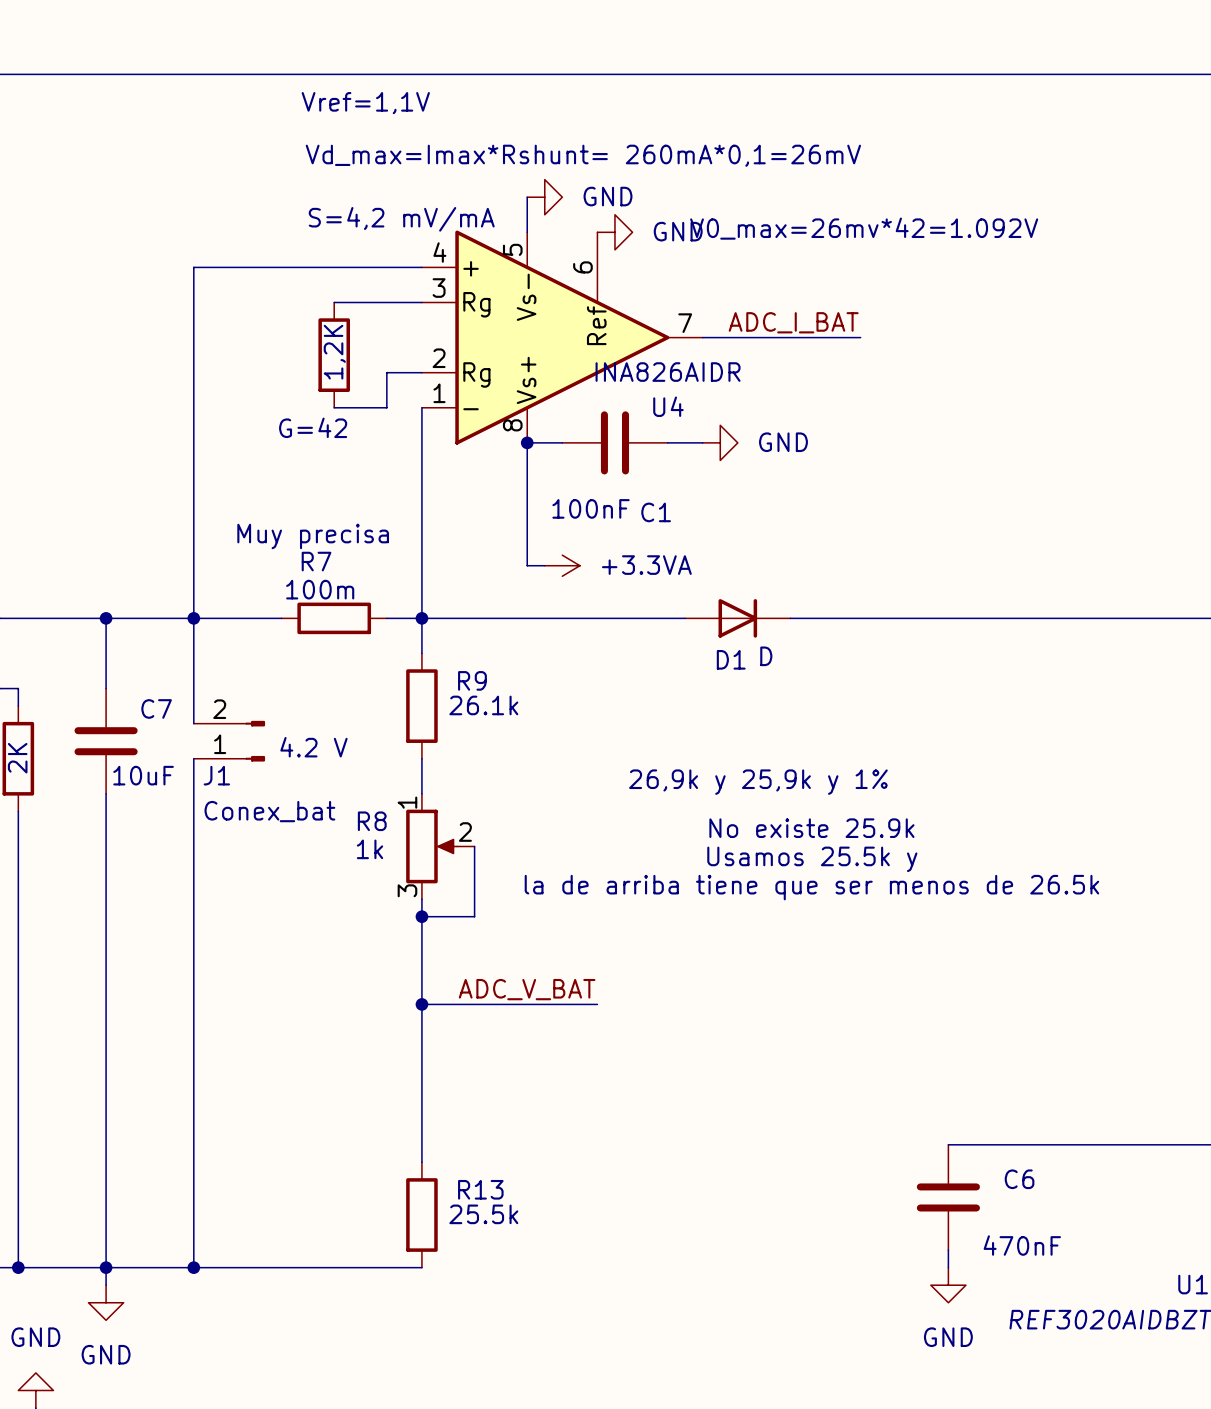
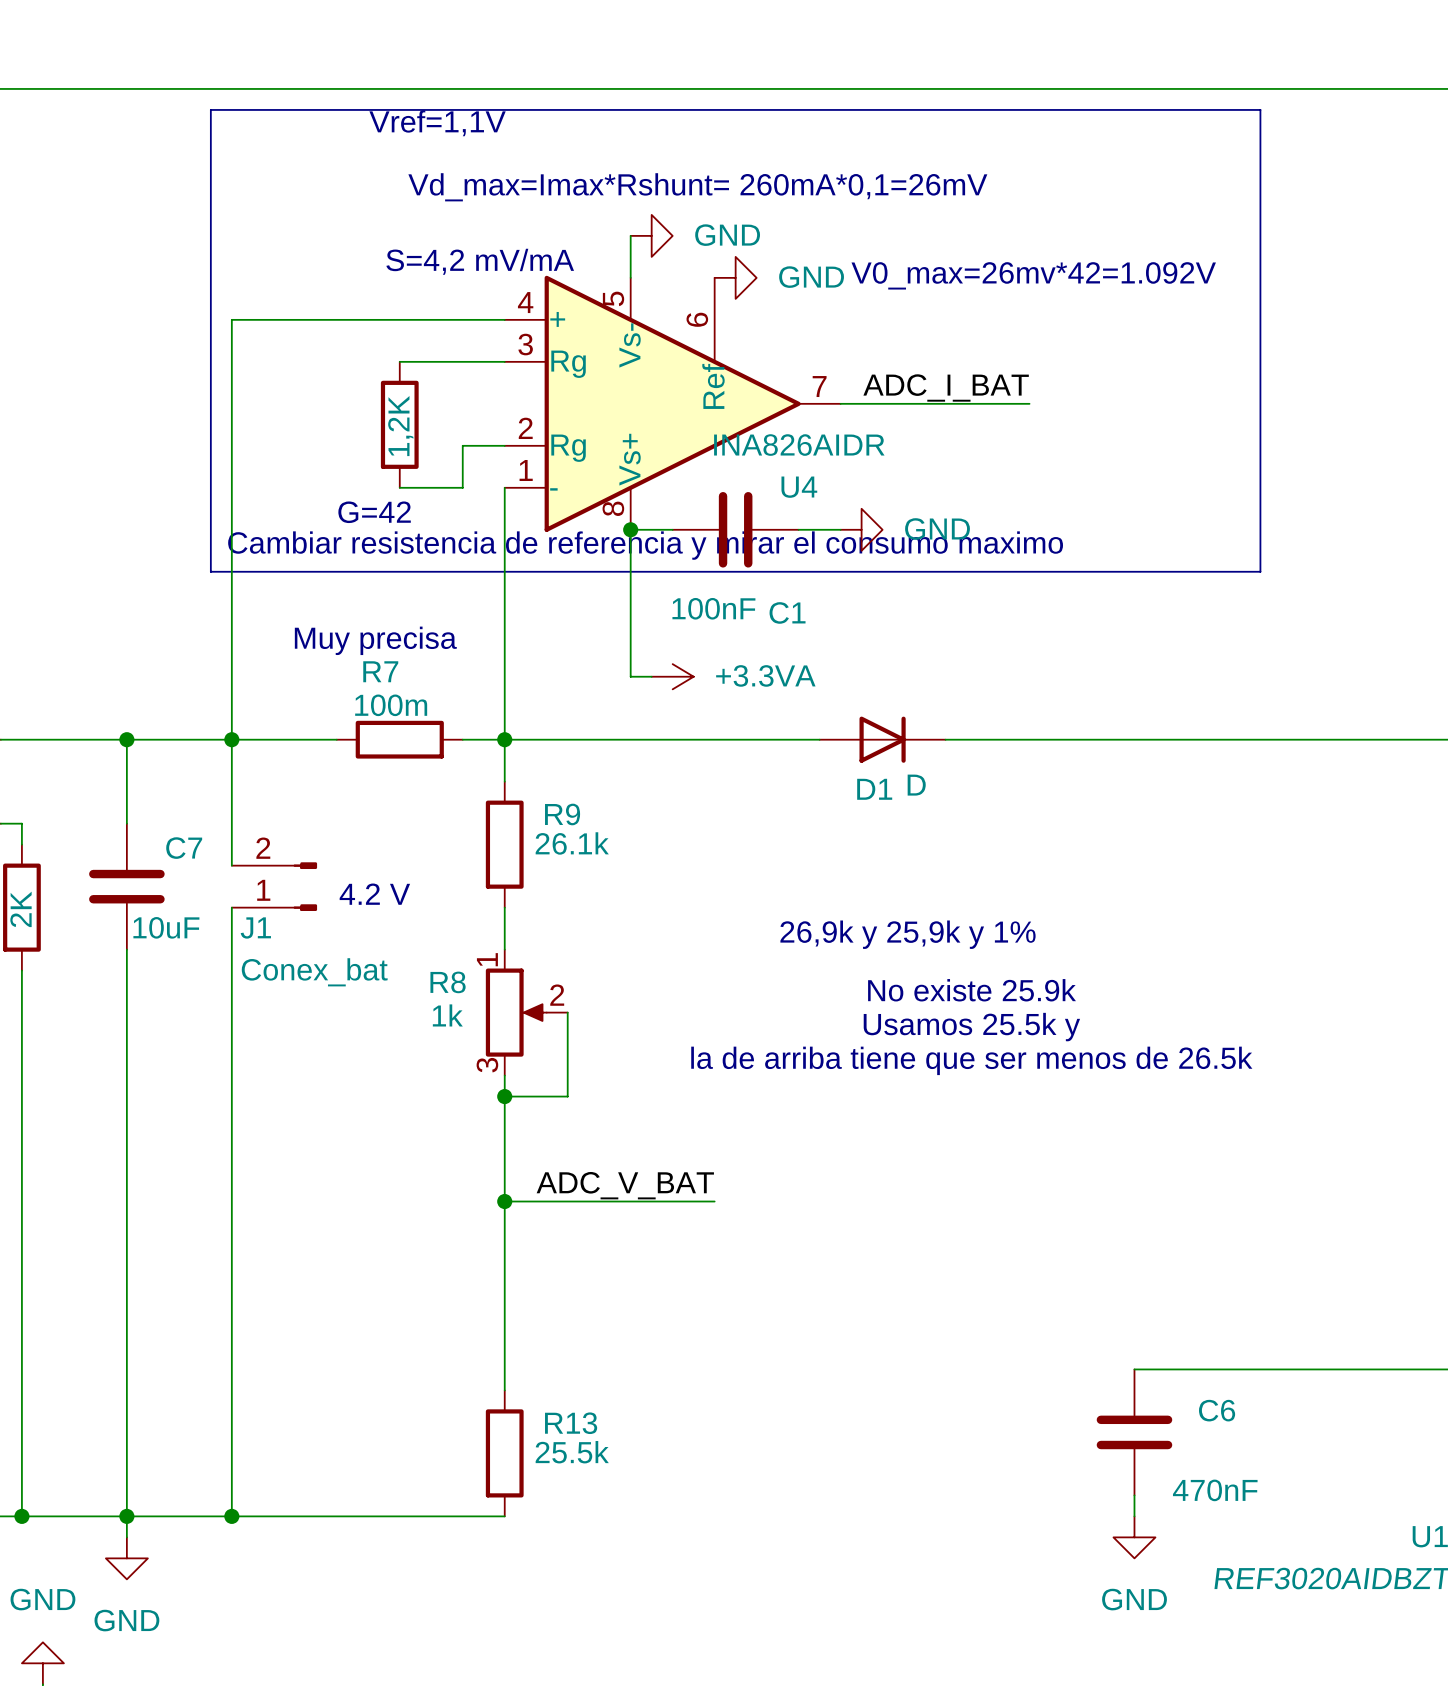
line: none -> (210, 109) (1260, 109) (1260, 571) (210, 571) (210, 109)
text: none -> Cambiar resistencia de referencia y mirar el consumo maximo (645, 545)

